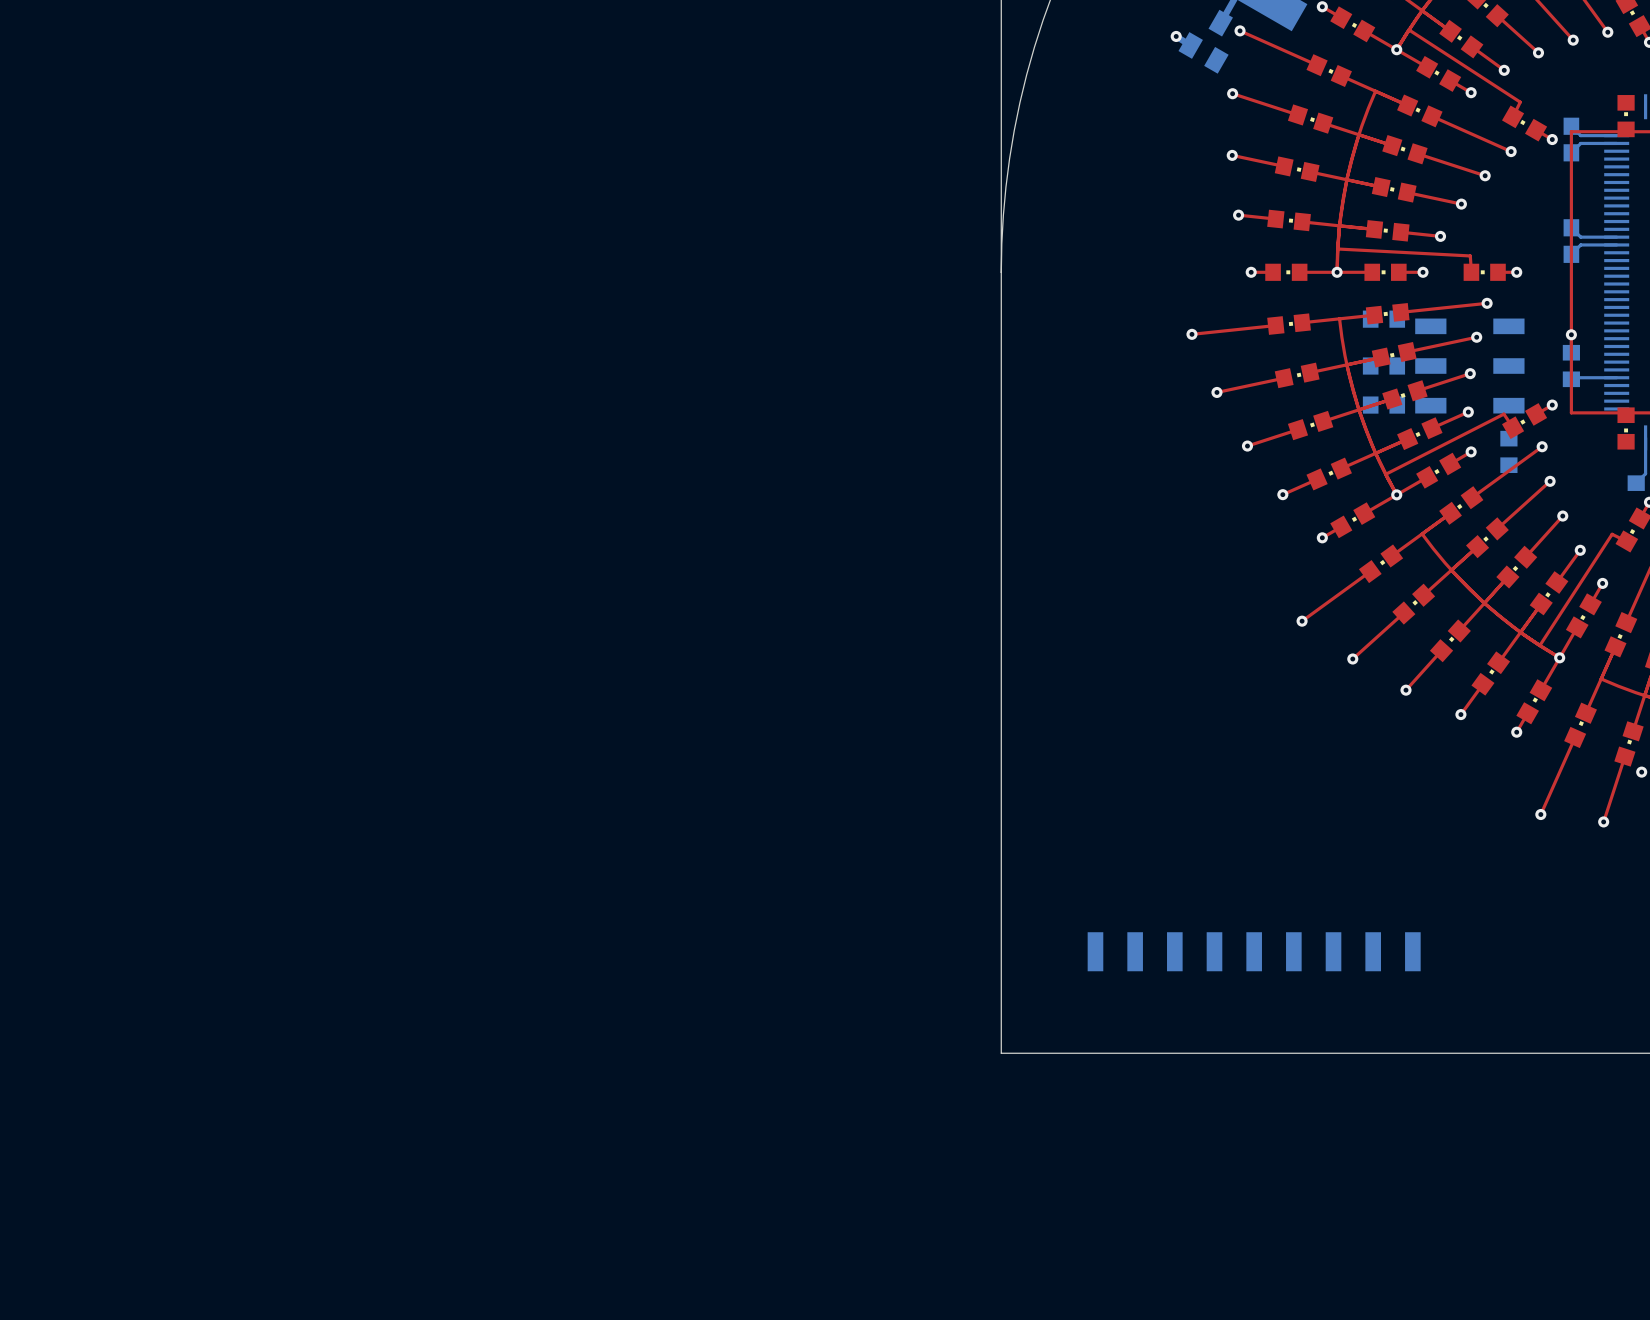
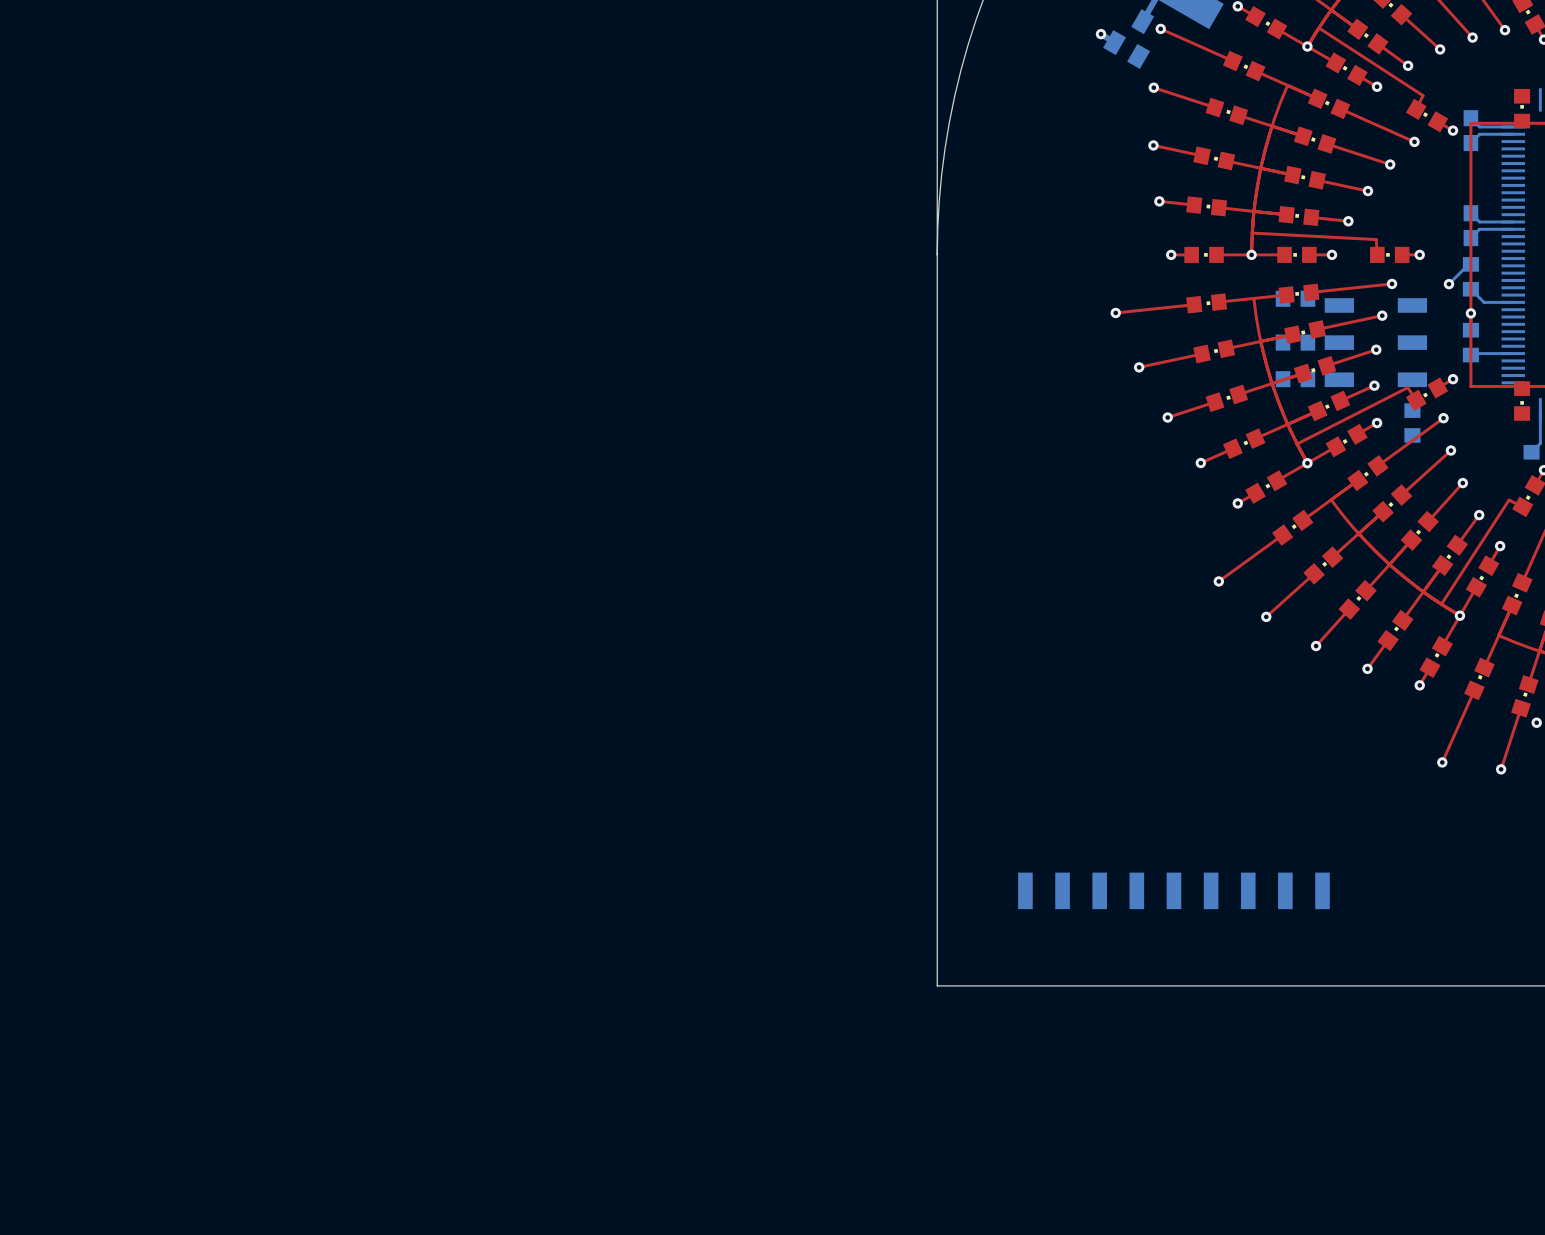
bottom track: none -> (1470, 264) (1448, 284)
part: none -> (1470, 276)
via: none -> (1448, 284)
bottom track: none -> (1470, 289) (1484, 302) (1513, 302)

